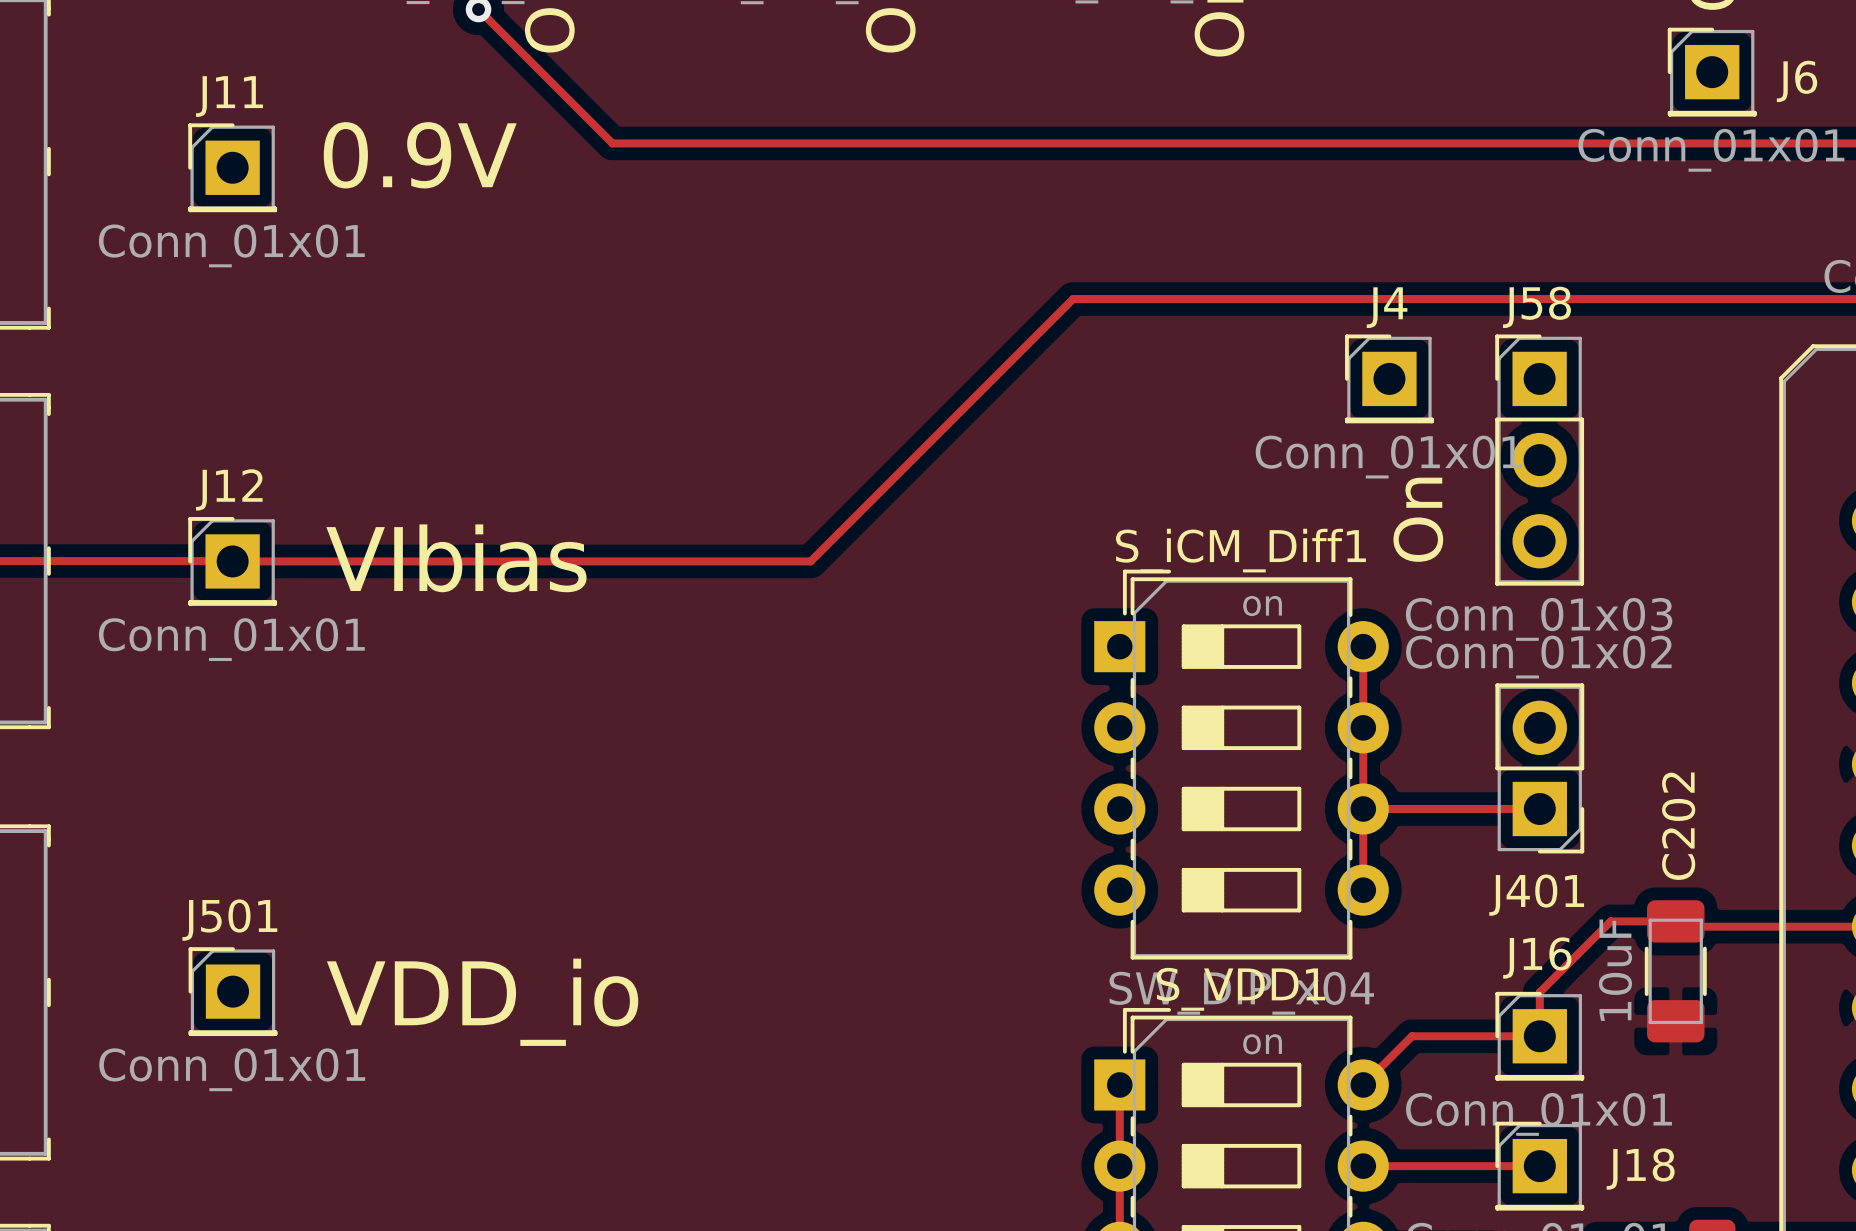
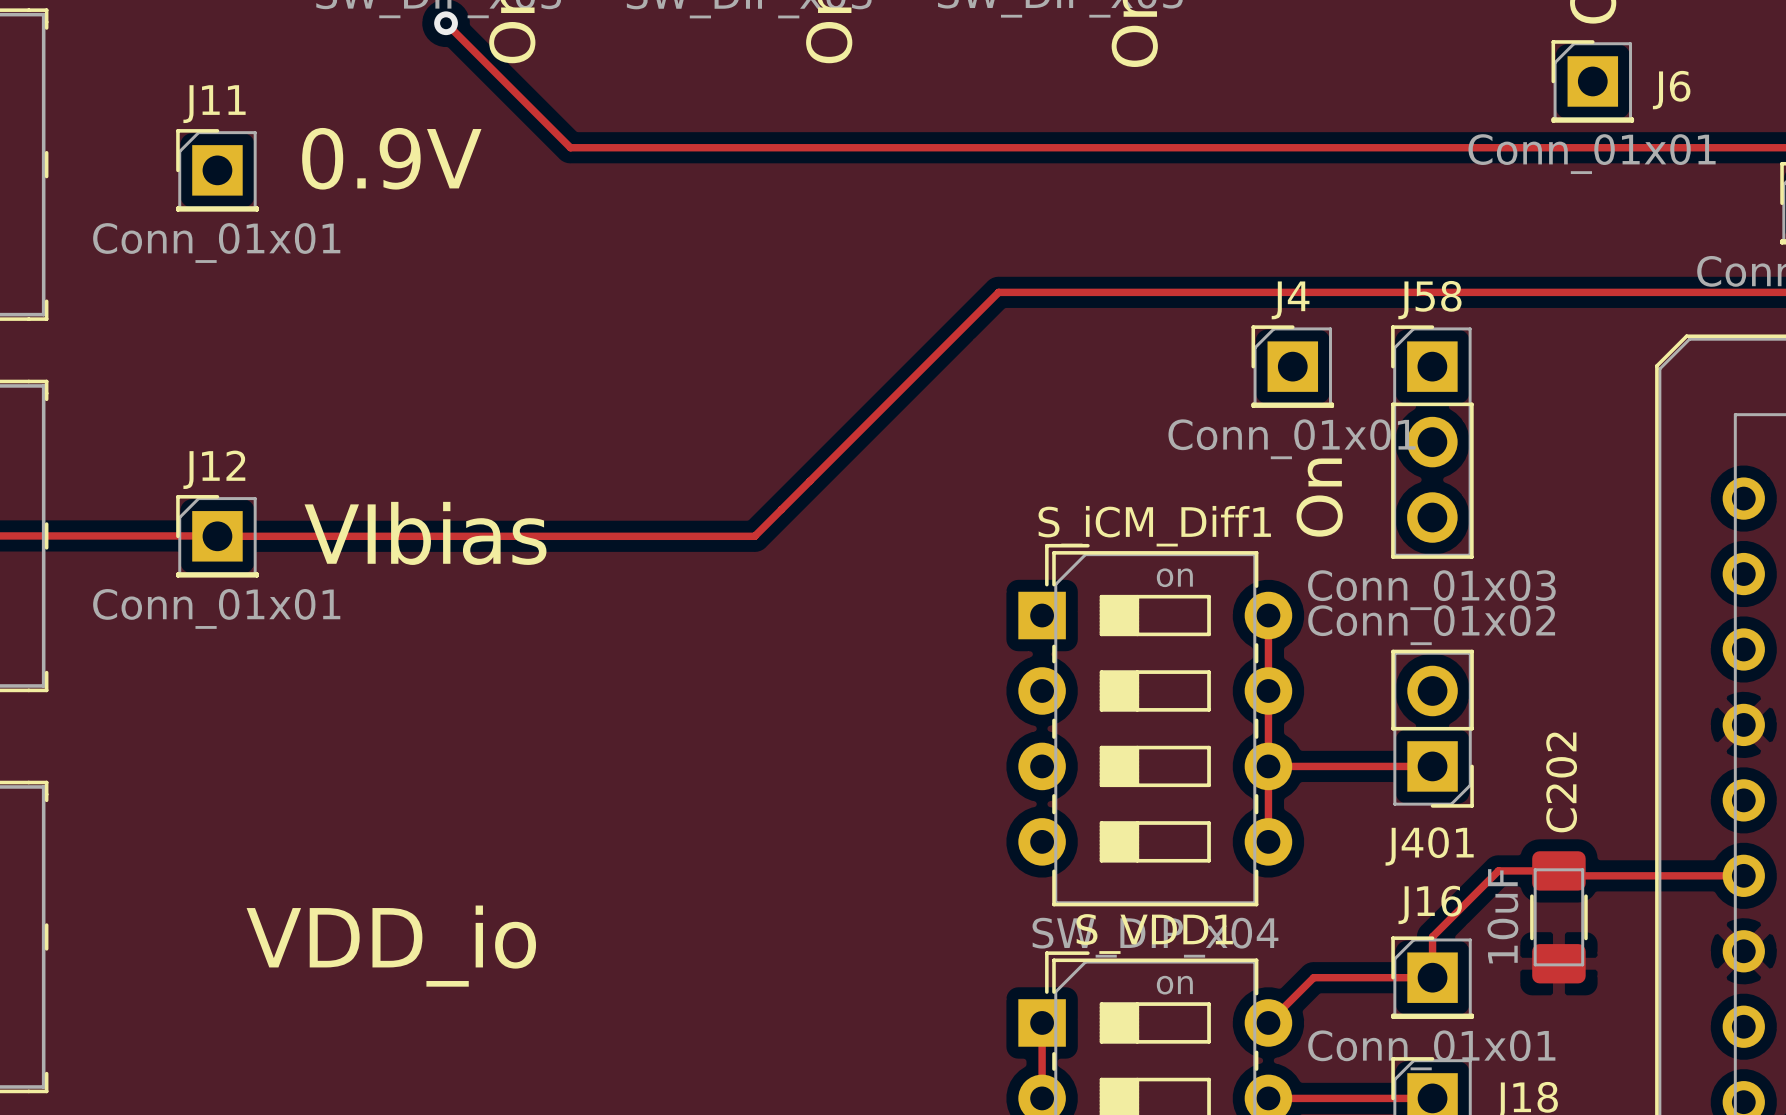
J501: Conn_01x01 (233, 991) -> none
text position: VDD_io (482, 1002) -> VDD_io (391, 946)

